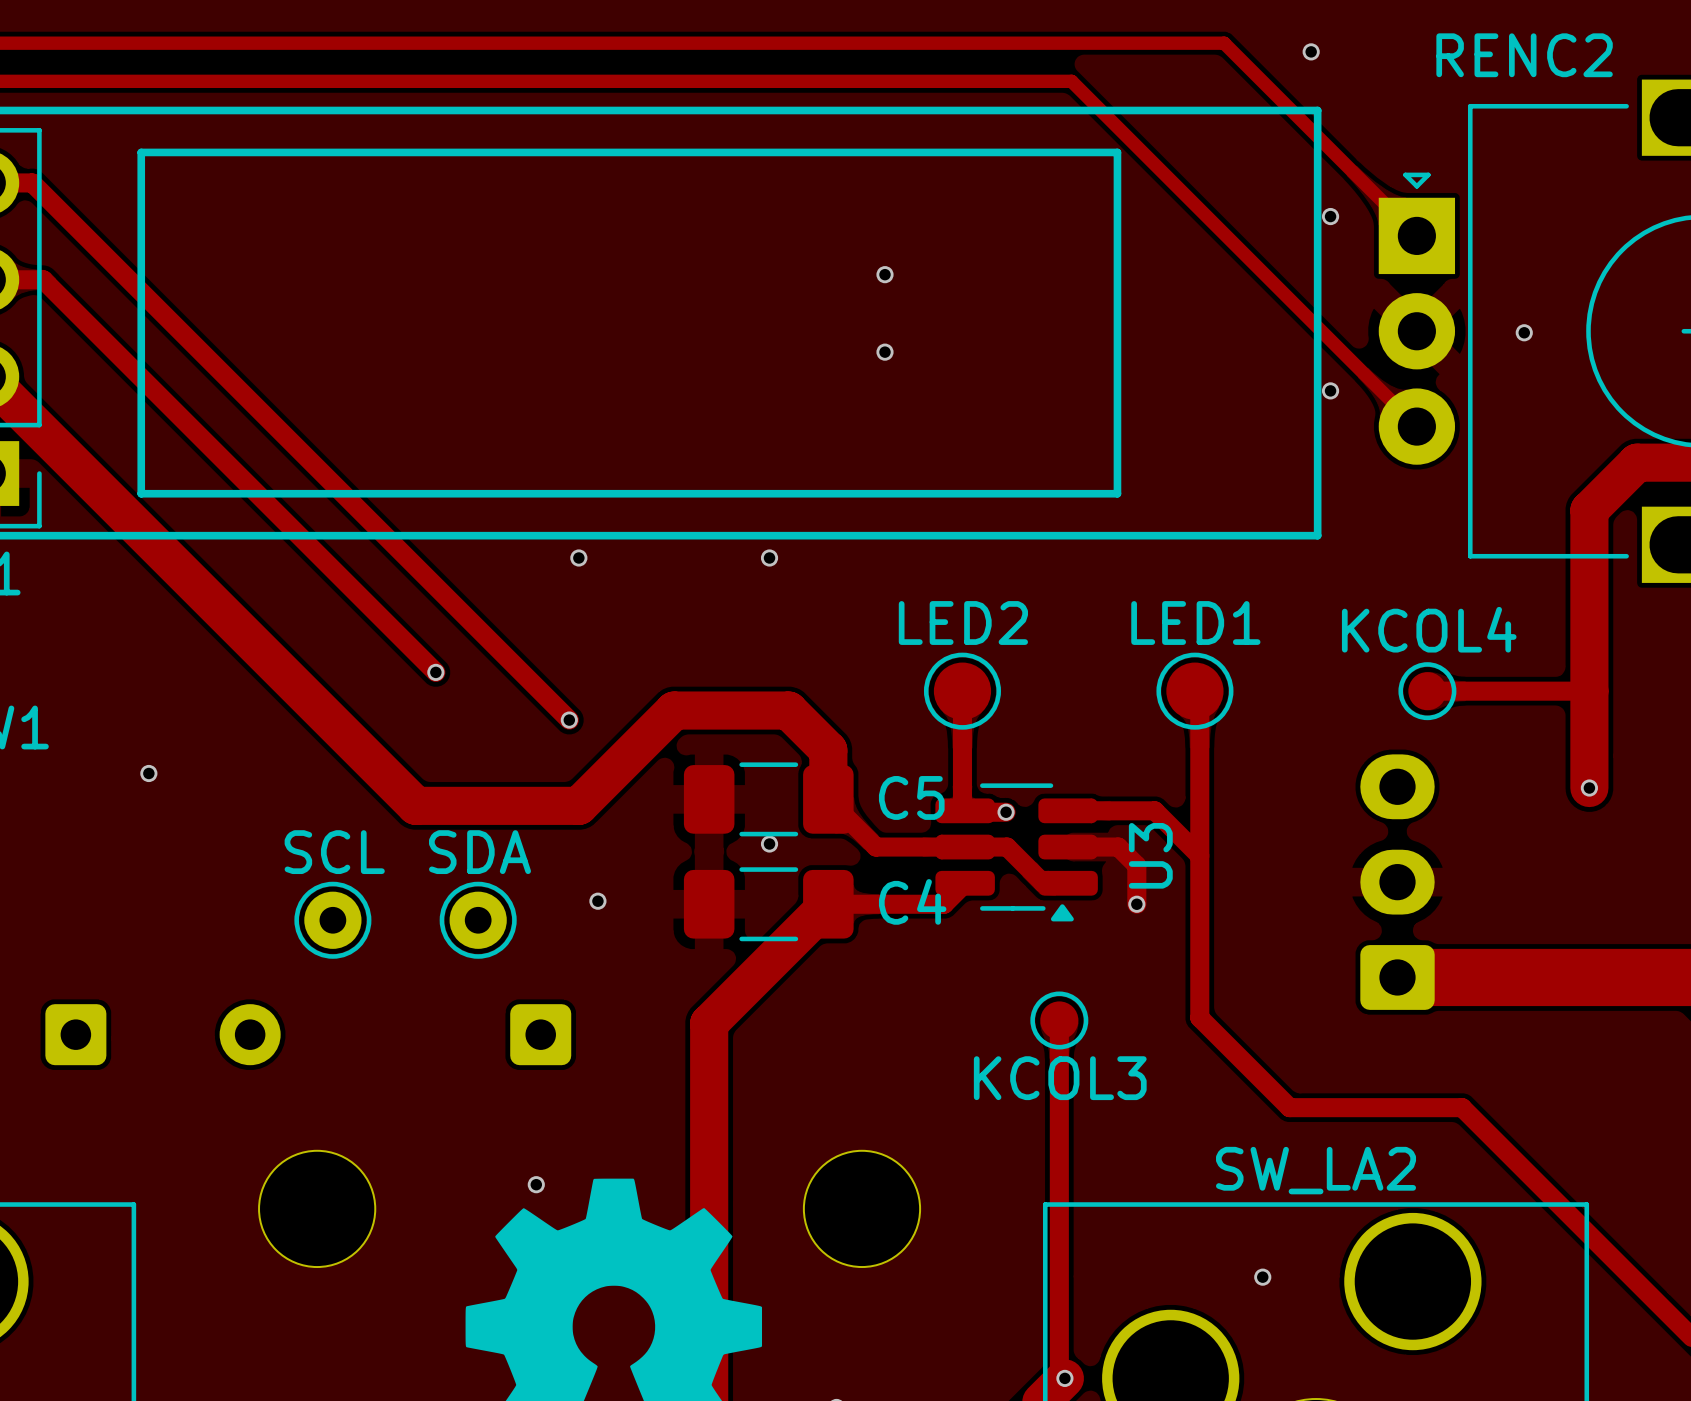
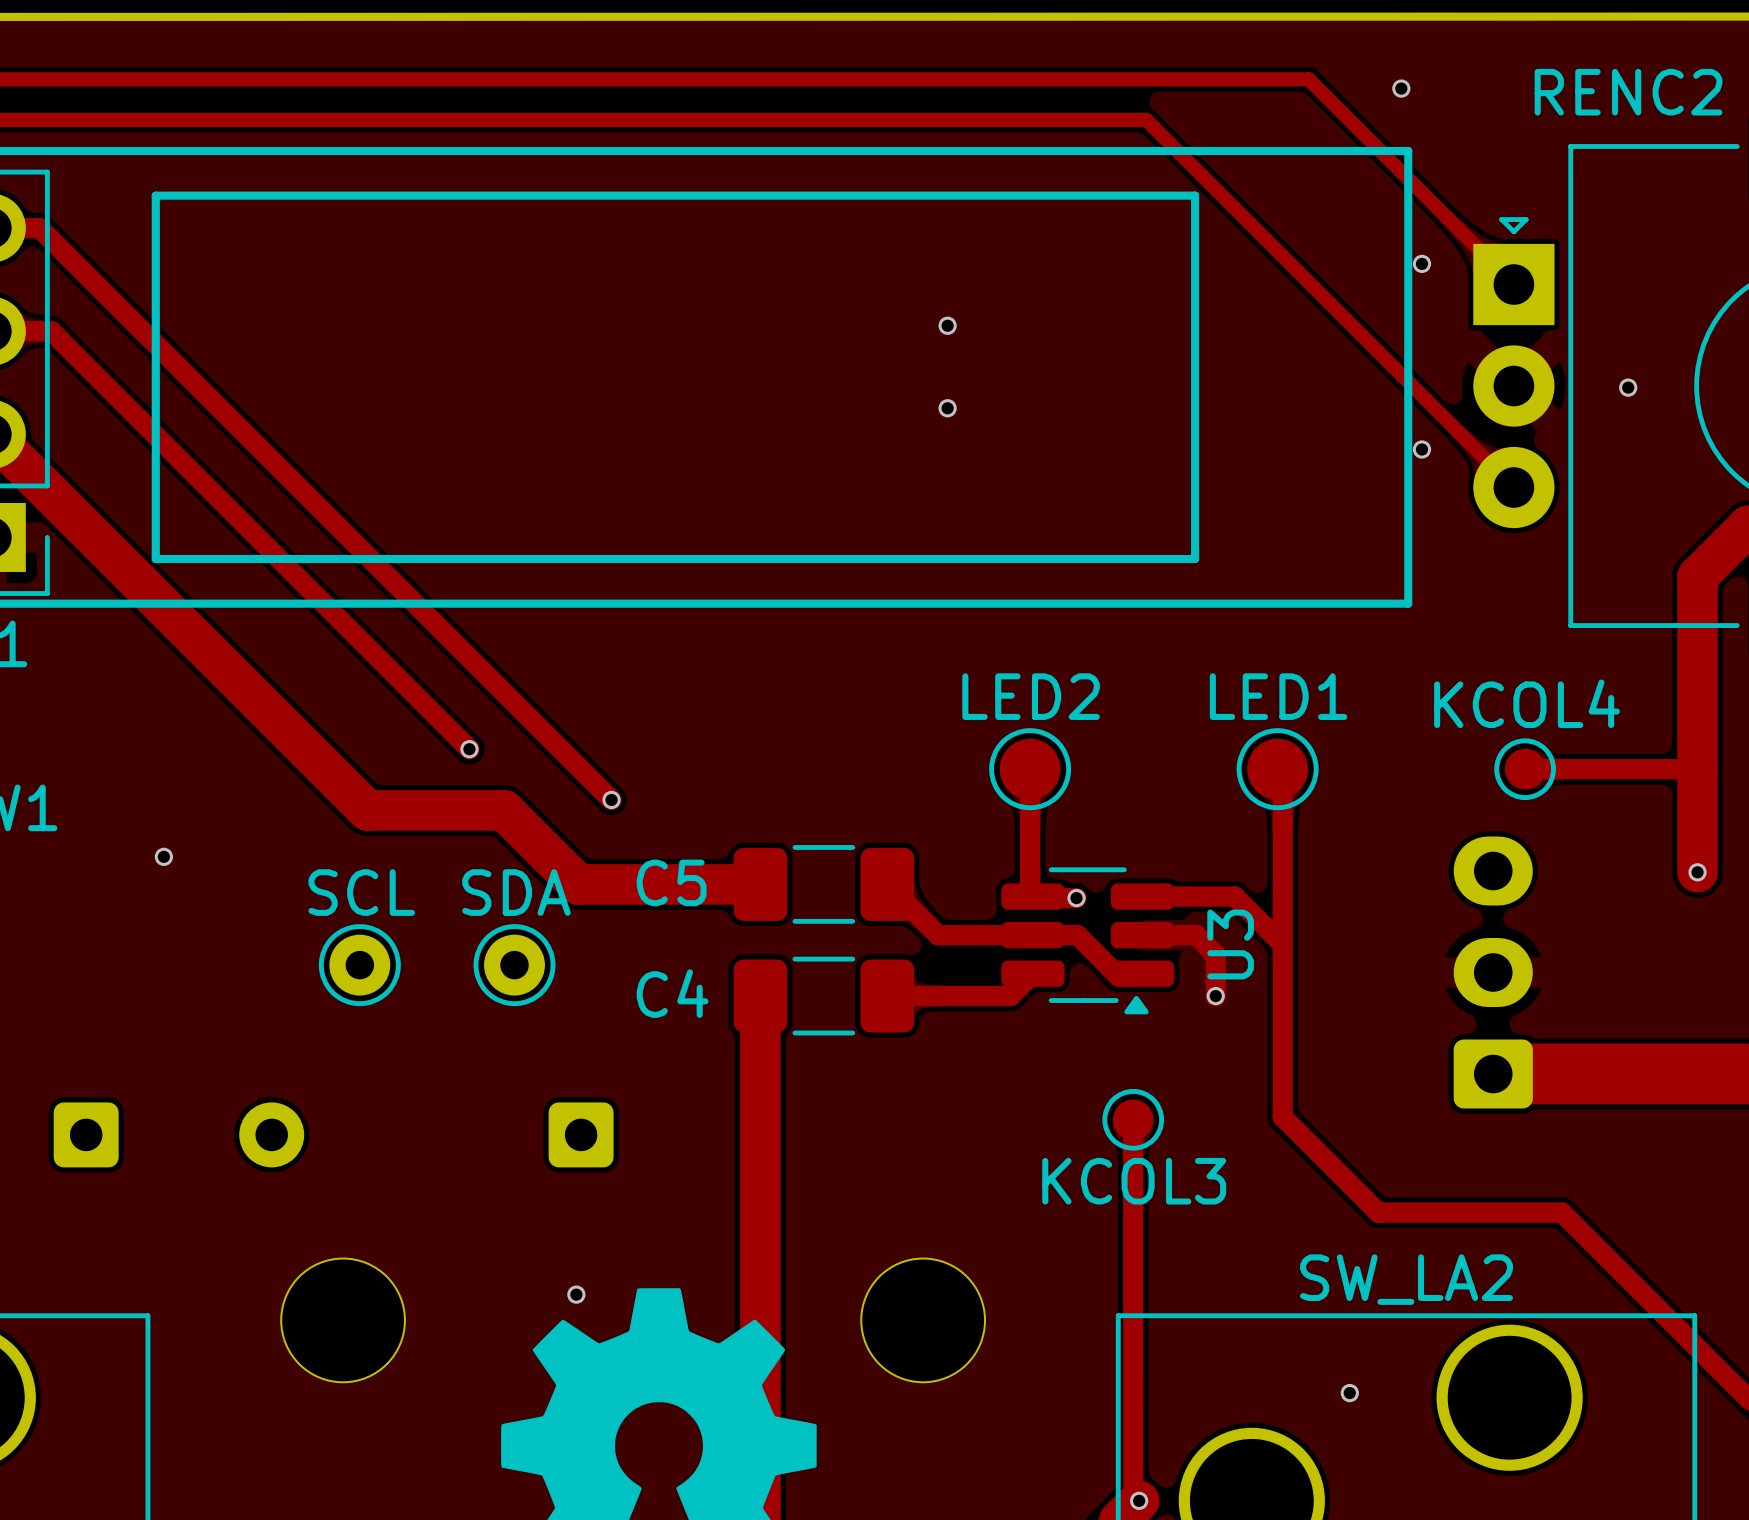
via: (578, 557) -> none
via: (769, 557) -> none
track: (340, 729) (415, 805) (578, 805) (674, 710) (788, 710) (828, 750) (828, 799) -> (367, 810) (504, 810) (578, 884) (760, 884)
C5 name position: C5 (911, 797) -> C5 (671, 882)
via: (769, 844) -> none
via: (597, 901) -> none
C4 name position: C4 (912, 901) -> C4 (672, 993)
track: (828, 904) (709, 1023) -> (760, 996) (760, 1122)
part position: (332, 920) -> (359, 965)
part position: (478, 920) -> (514, 965)

